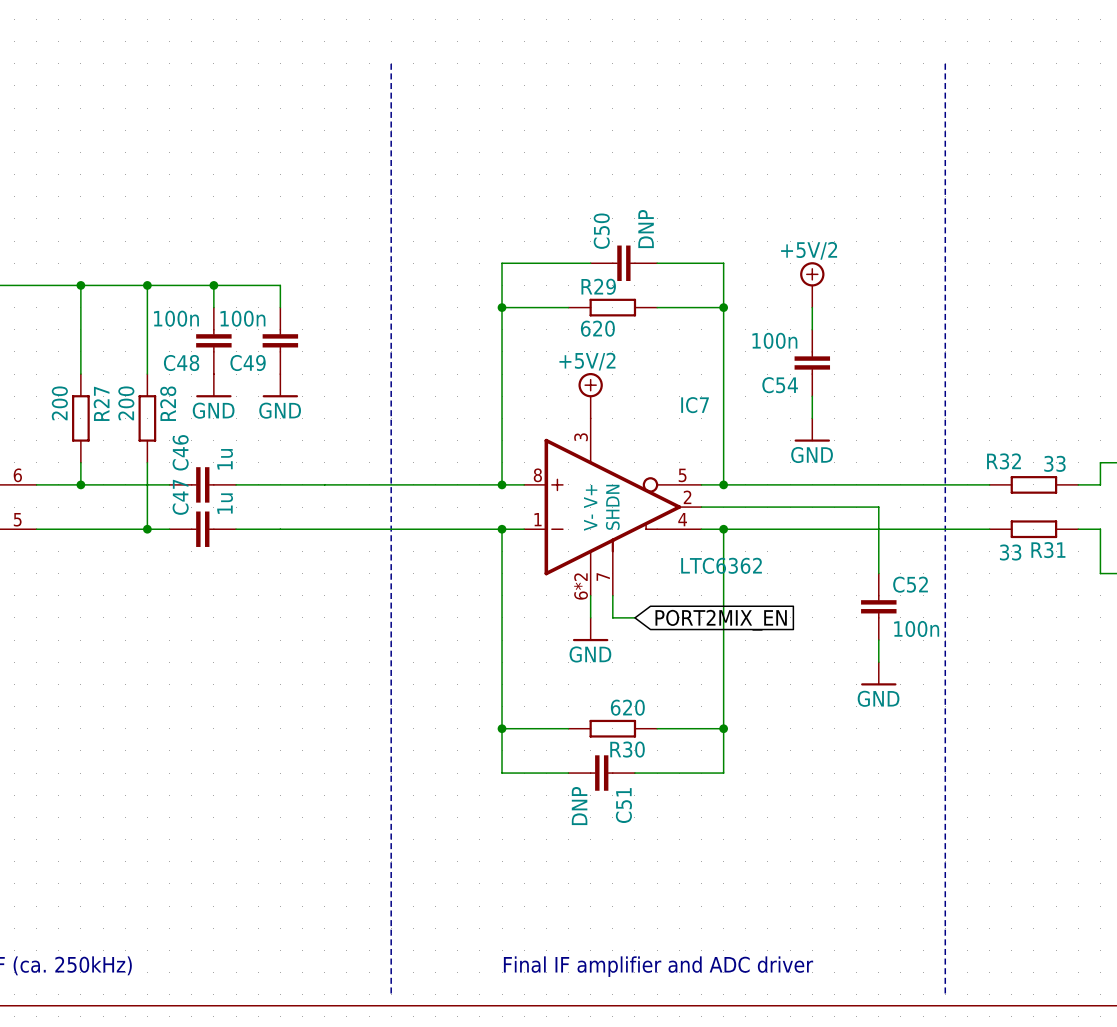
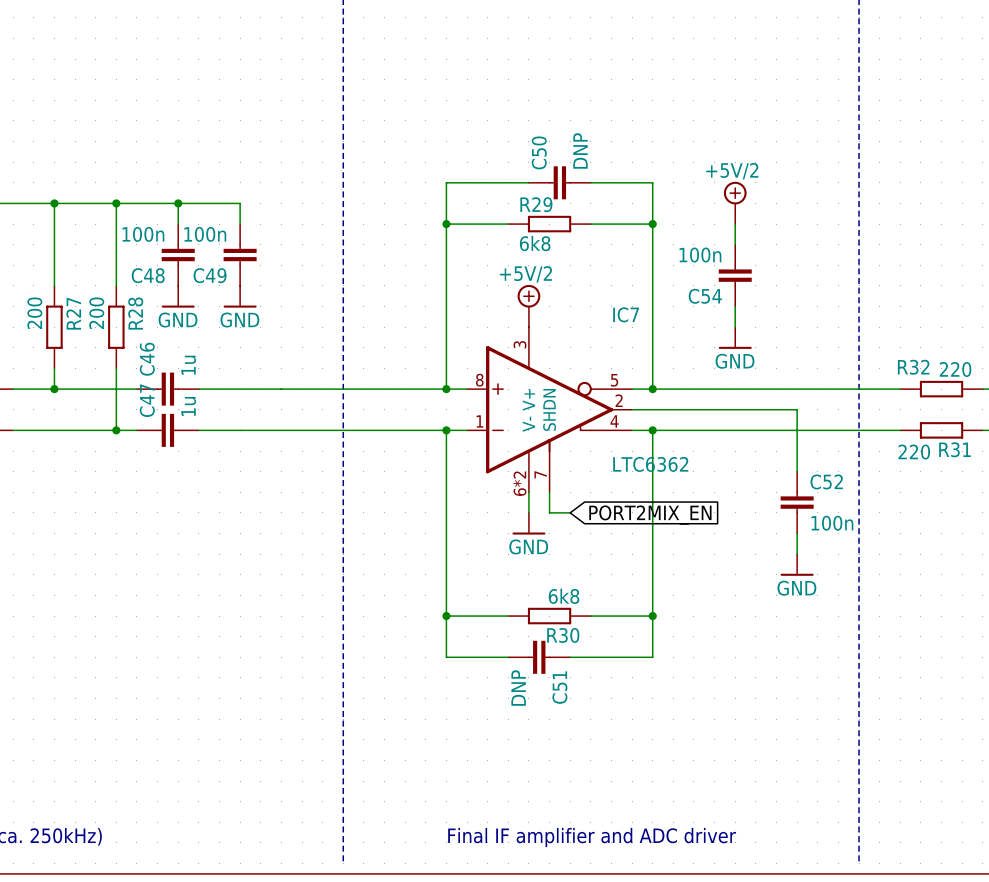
R29 value: 620 (597, 328) -> 6k8 (535, 243)
R32 value: 33 (1054, 463) -> 220 (955, 369)
R31 value: 33 (1010, 552) -> 220 (914, 452)
R30 value: 620 (627, 707) -> 6k8 (564, 596)

